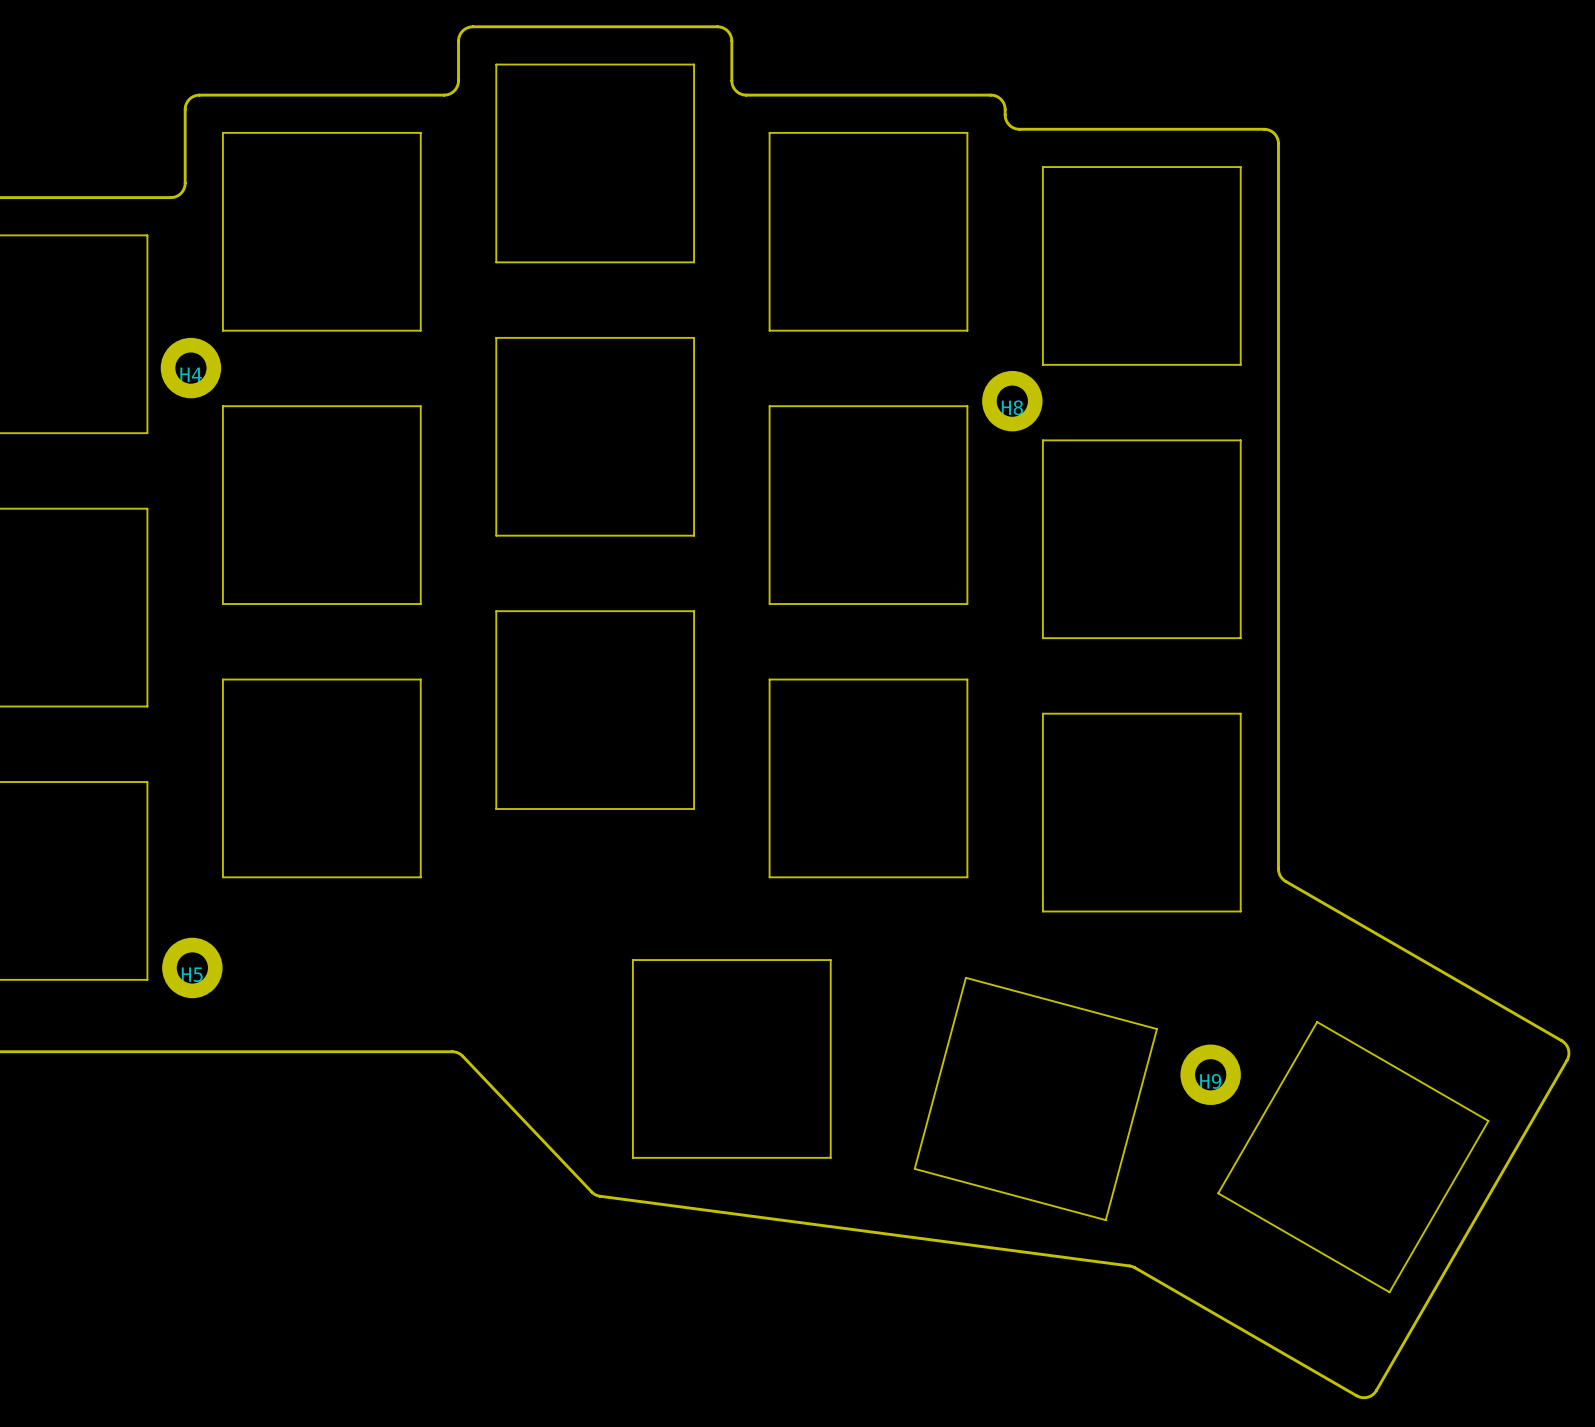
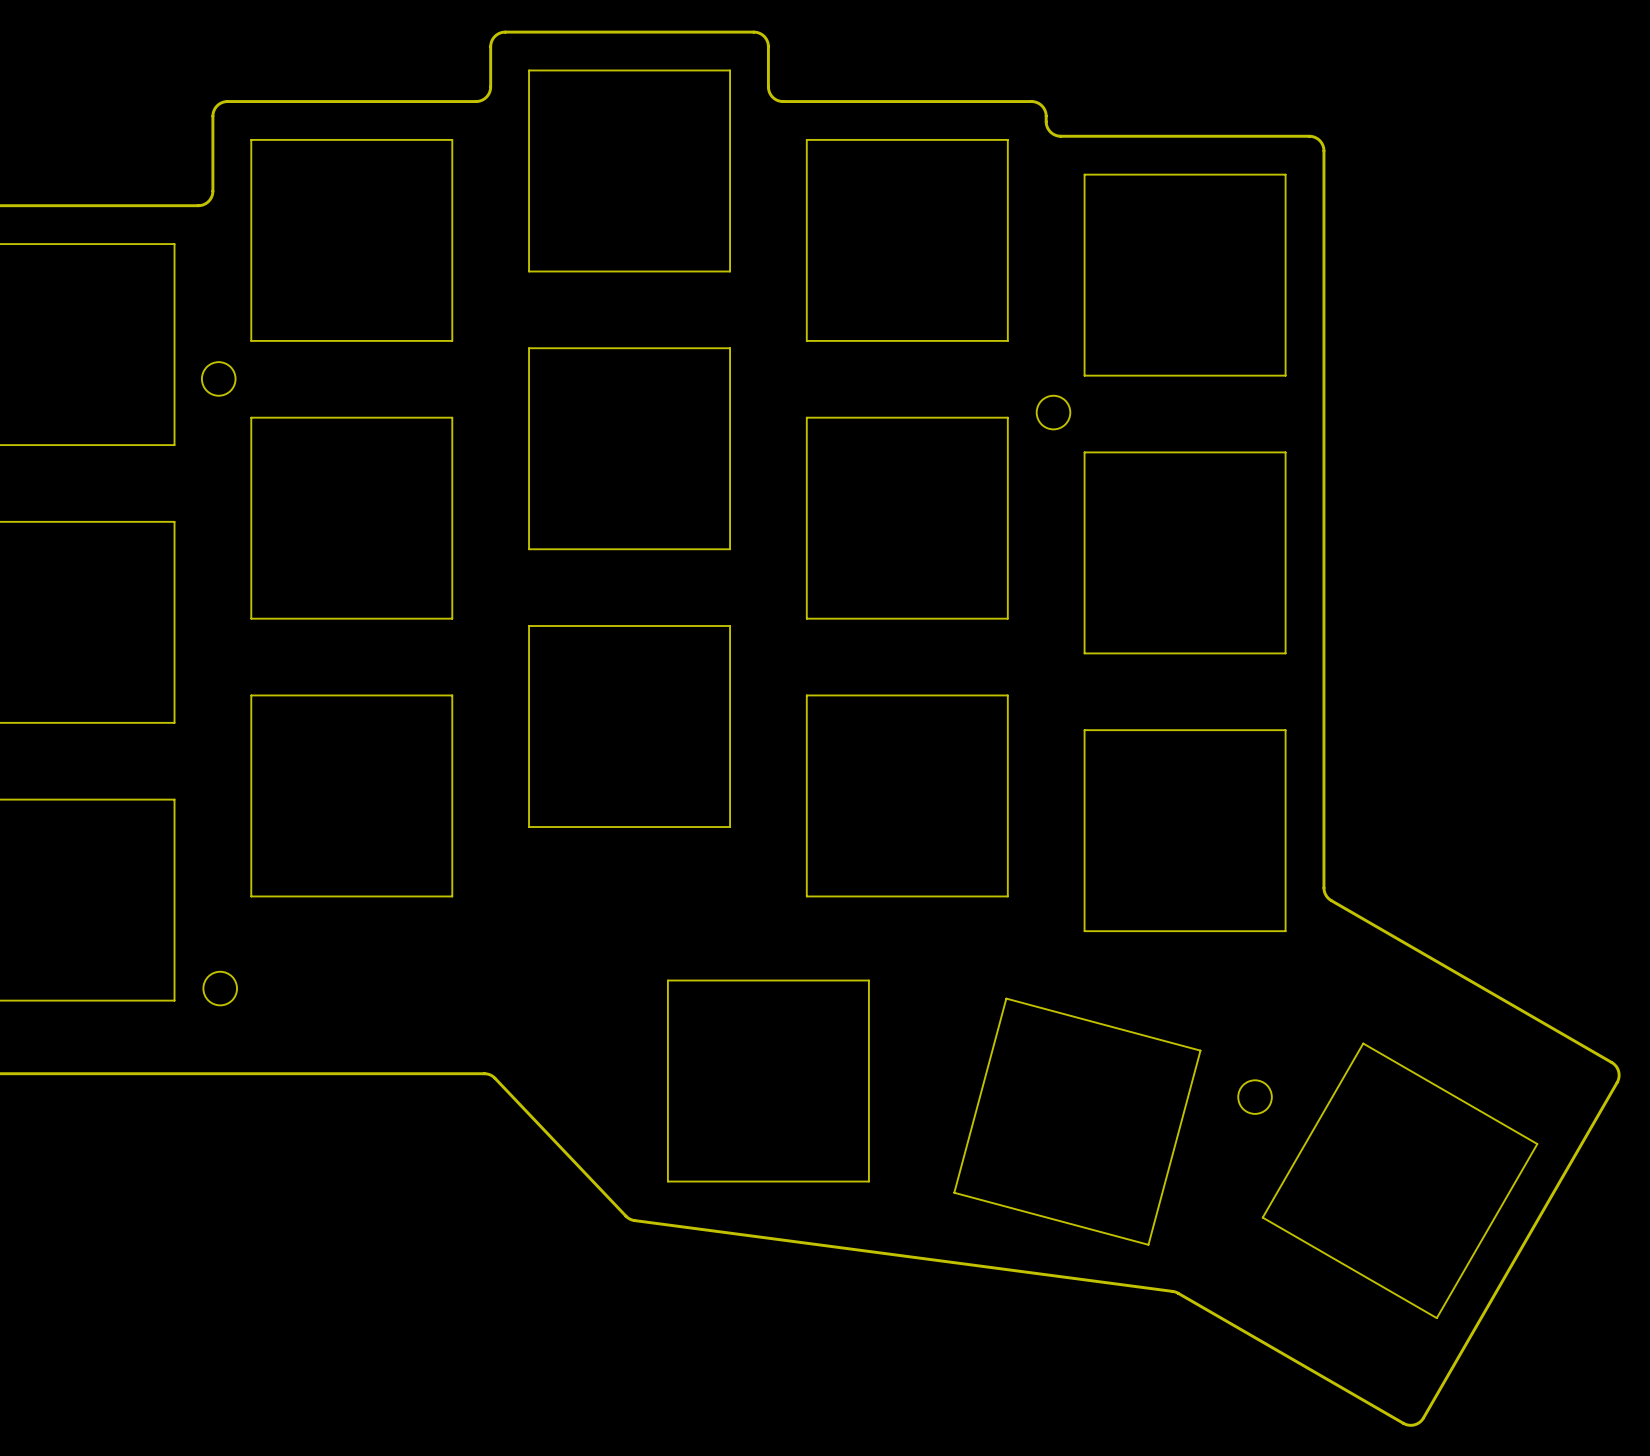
drawing: none -> [201, 361, 237, 397]
H4: (190, 368) -> none
drawing: none -> [1035, 395, 1072, 431]
H8: (1012, 401) -> none
drawing: none -> [202, 971, 238, 1007]
H5: (192, 967) -> none
drawing: none -> [1237, 1079, 1273, 1115]
H9: (1210, 1074) -> none

